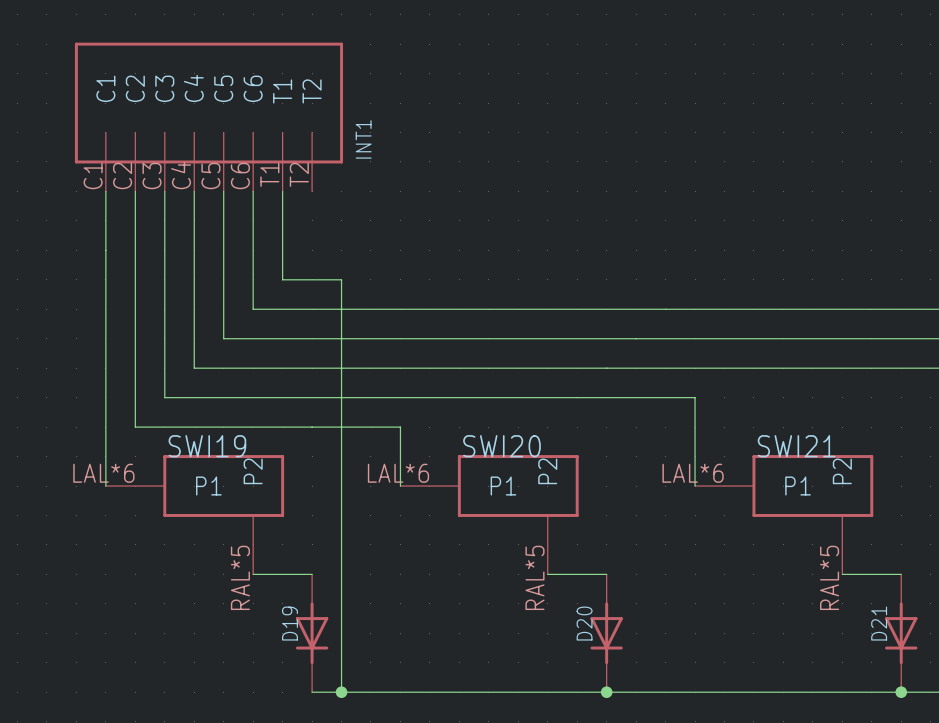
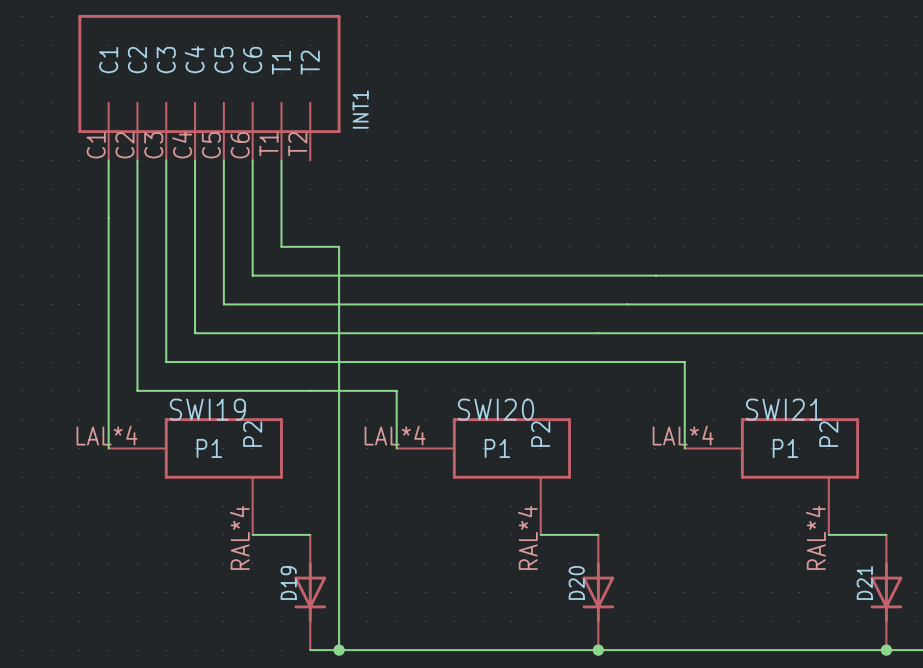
SWI19 pin number: LAL*6 (103, 473) -> LAL*4 (107, 435)
SWI20 pin number: LAL*6 (398, 473) -> LAL*4 (395, 435)
SWI21 pin number: LAL*6 (693, 473) -> LAL*4 (683, 435)
SWI19 pin number: RAL*5 (240, 577) -> RAL*4 (239, 537)
SWI20 pin number: RAL*5 (534, 577) -> RAL*4 (527, 537)
SWI21 pin number: RAL*5 (829, 577) -> RAL*4 (815, 537)

